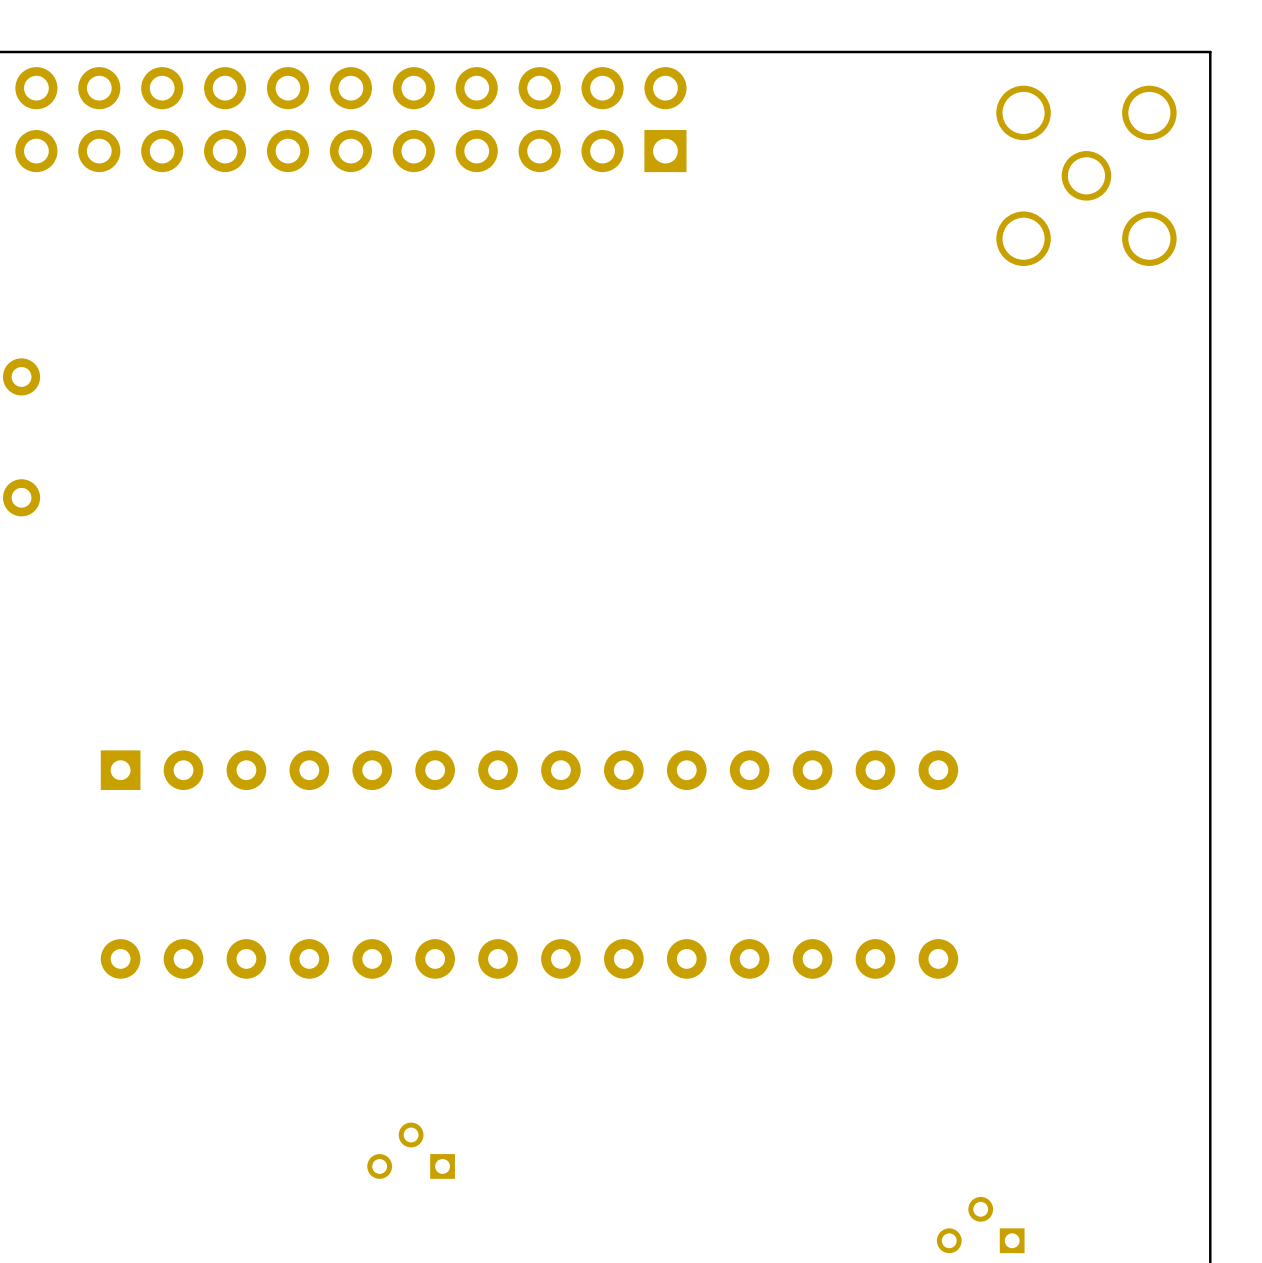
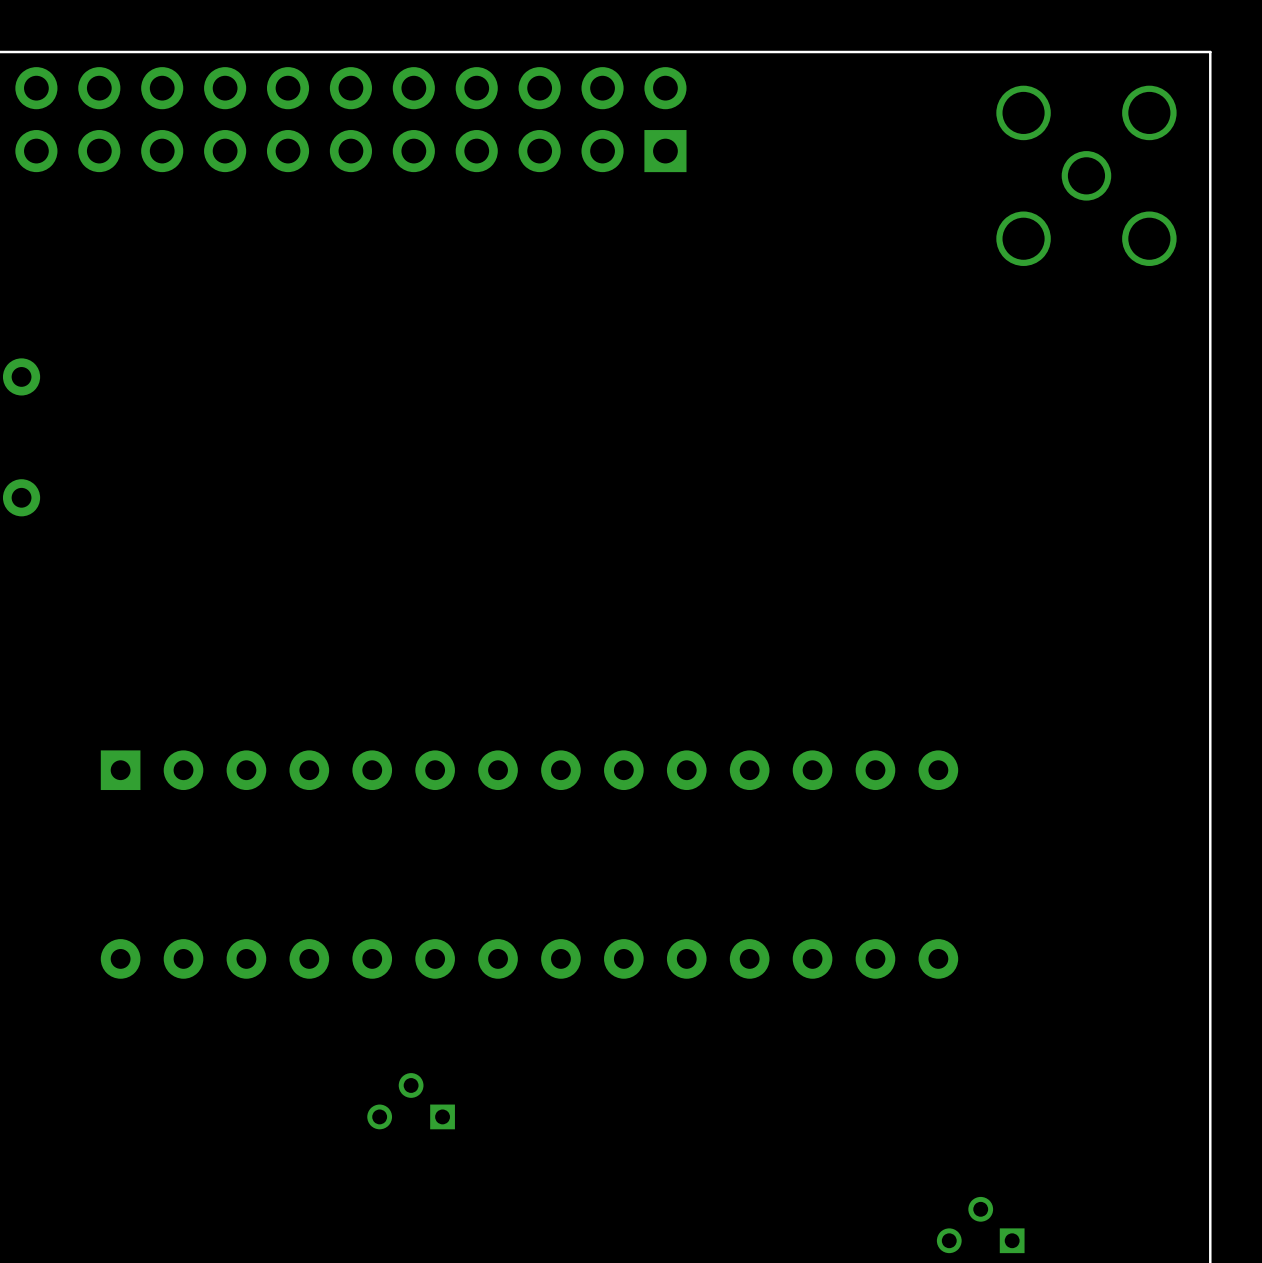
part position: (411, 1150) -> (411, 1101)

